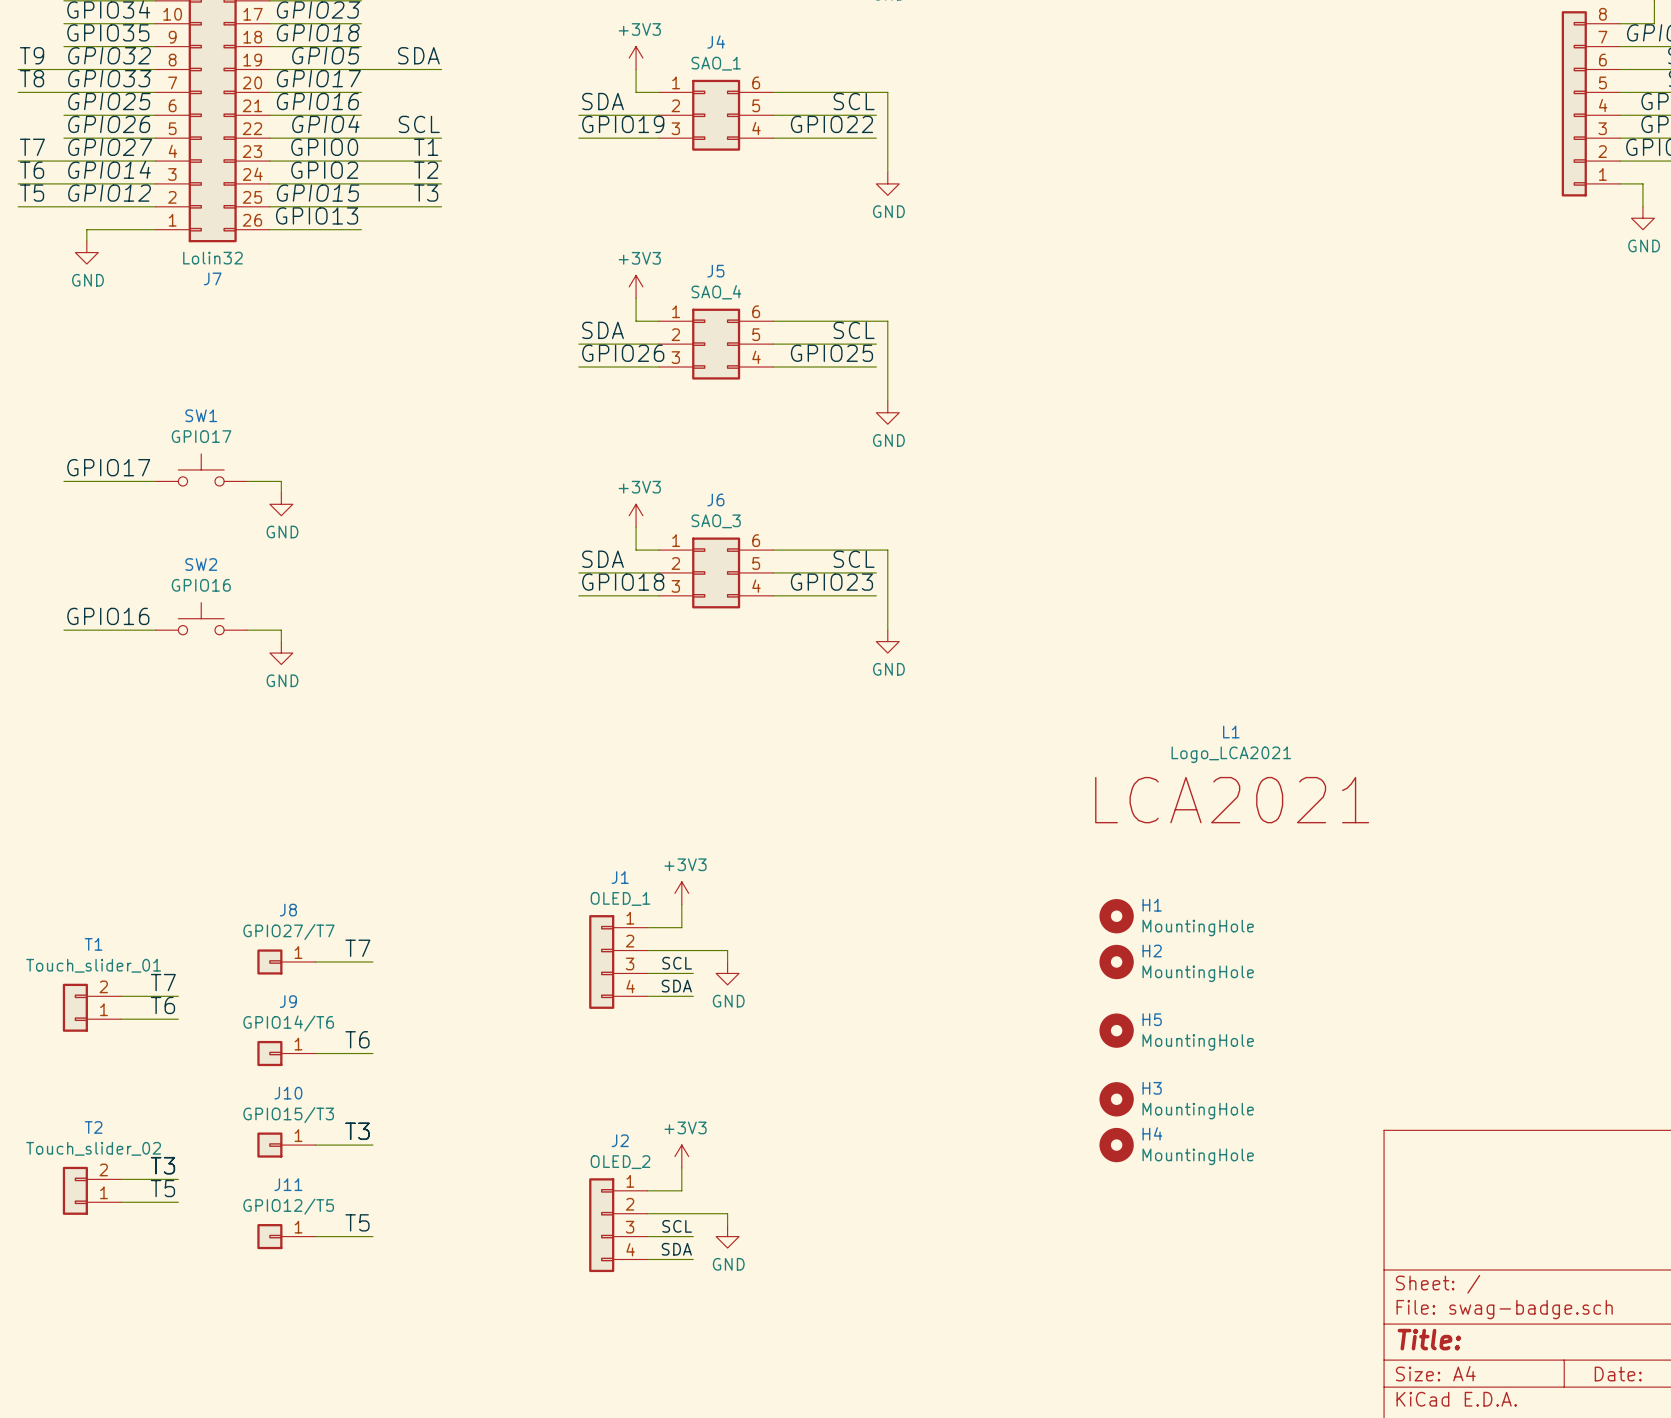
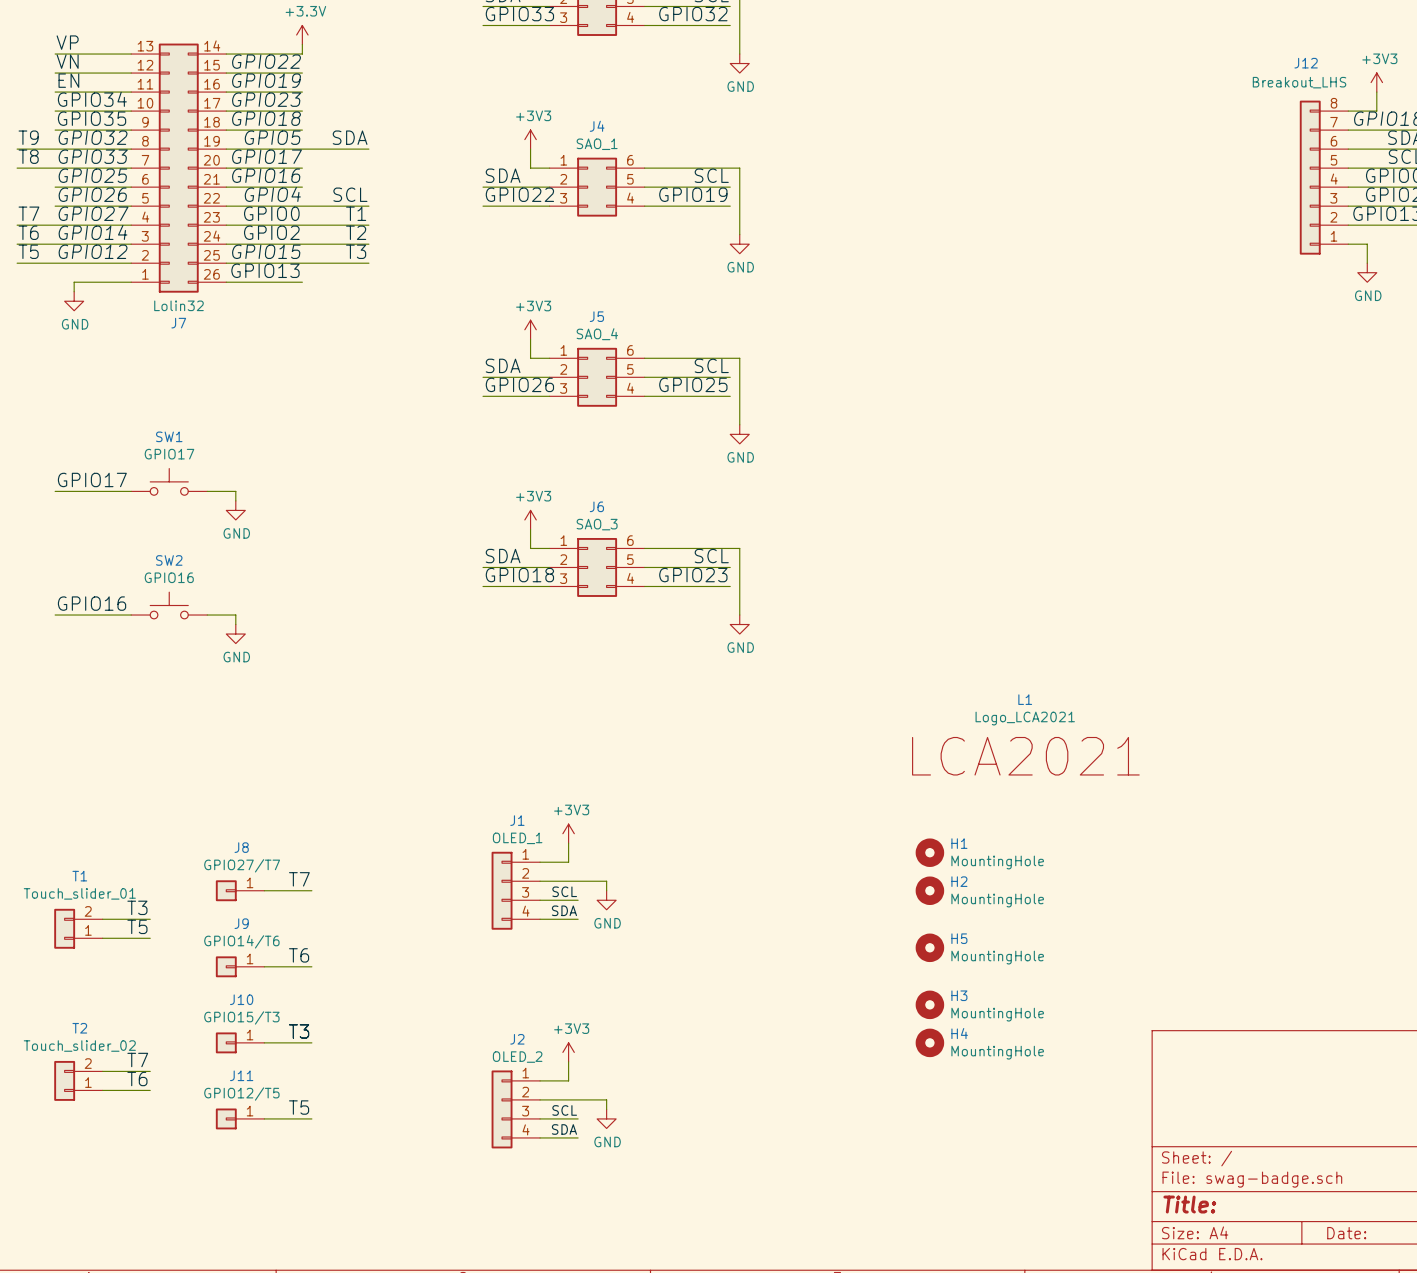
label: GPIO19 (623, 124) -> GPIO22 (519, 194)
label: GPIO22 (831, 124) -> GPIO19 (693, 194)
label: T7 (163, 982) -> T3 (137, 907)
label: T6 (162, 1005) -> T5 (137, 926)
label: T3 (162, 1165) -> T7 (137, 1059)
label: T5 (162, 1188) -> T6 (137, 1079)

